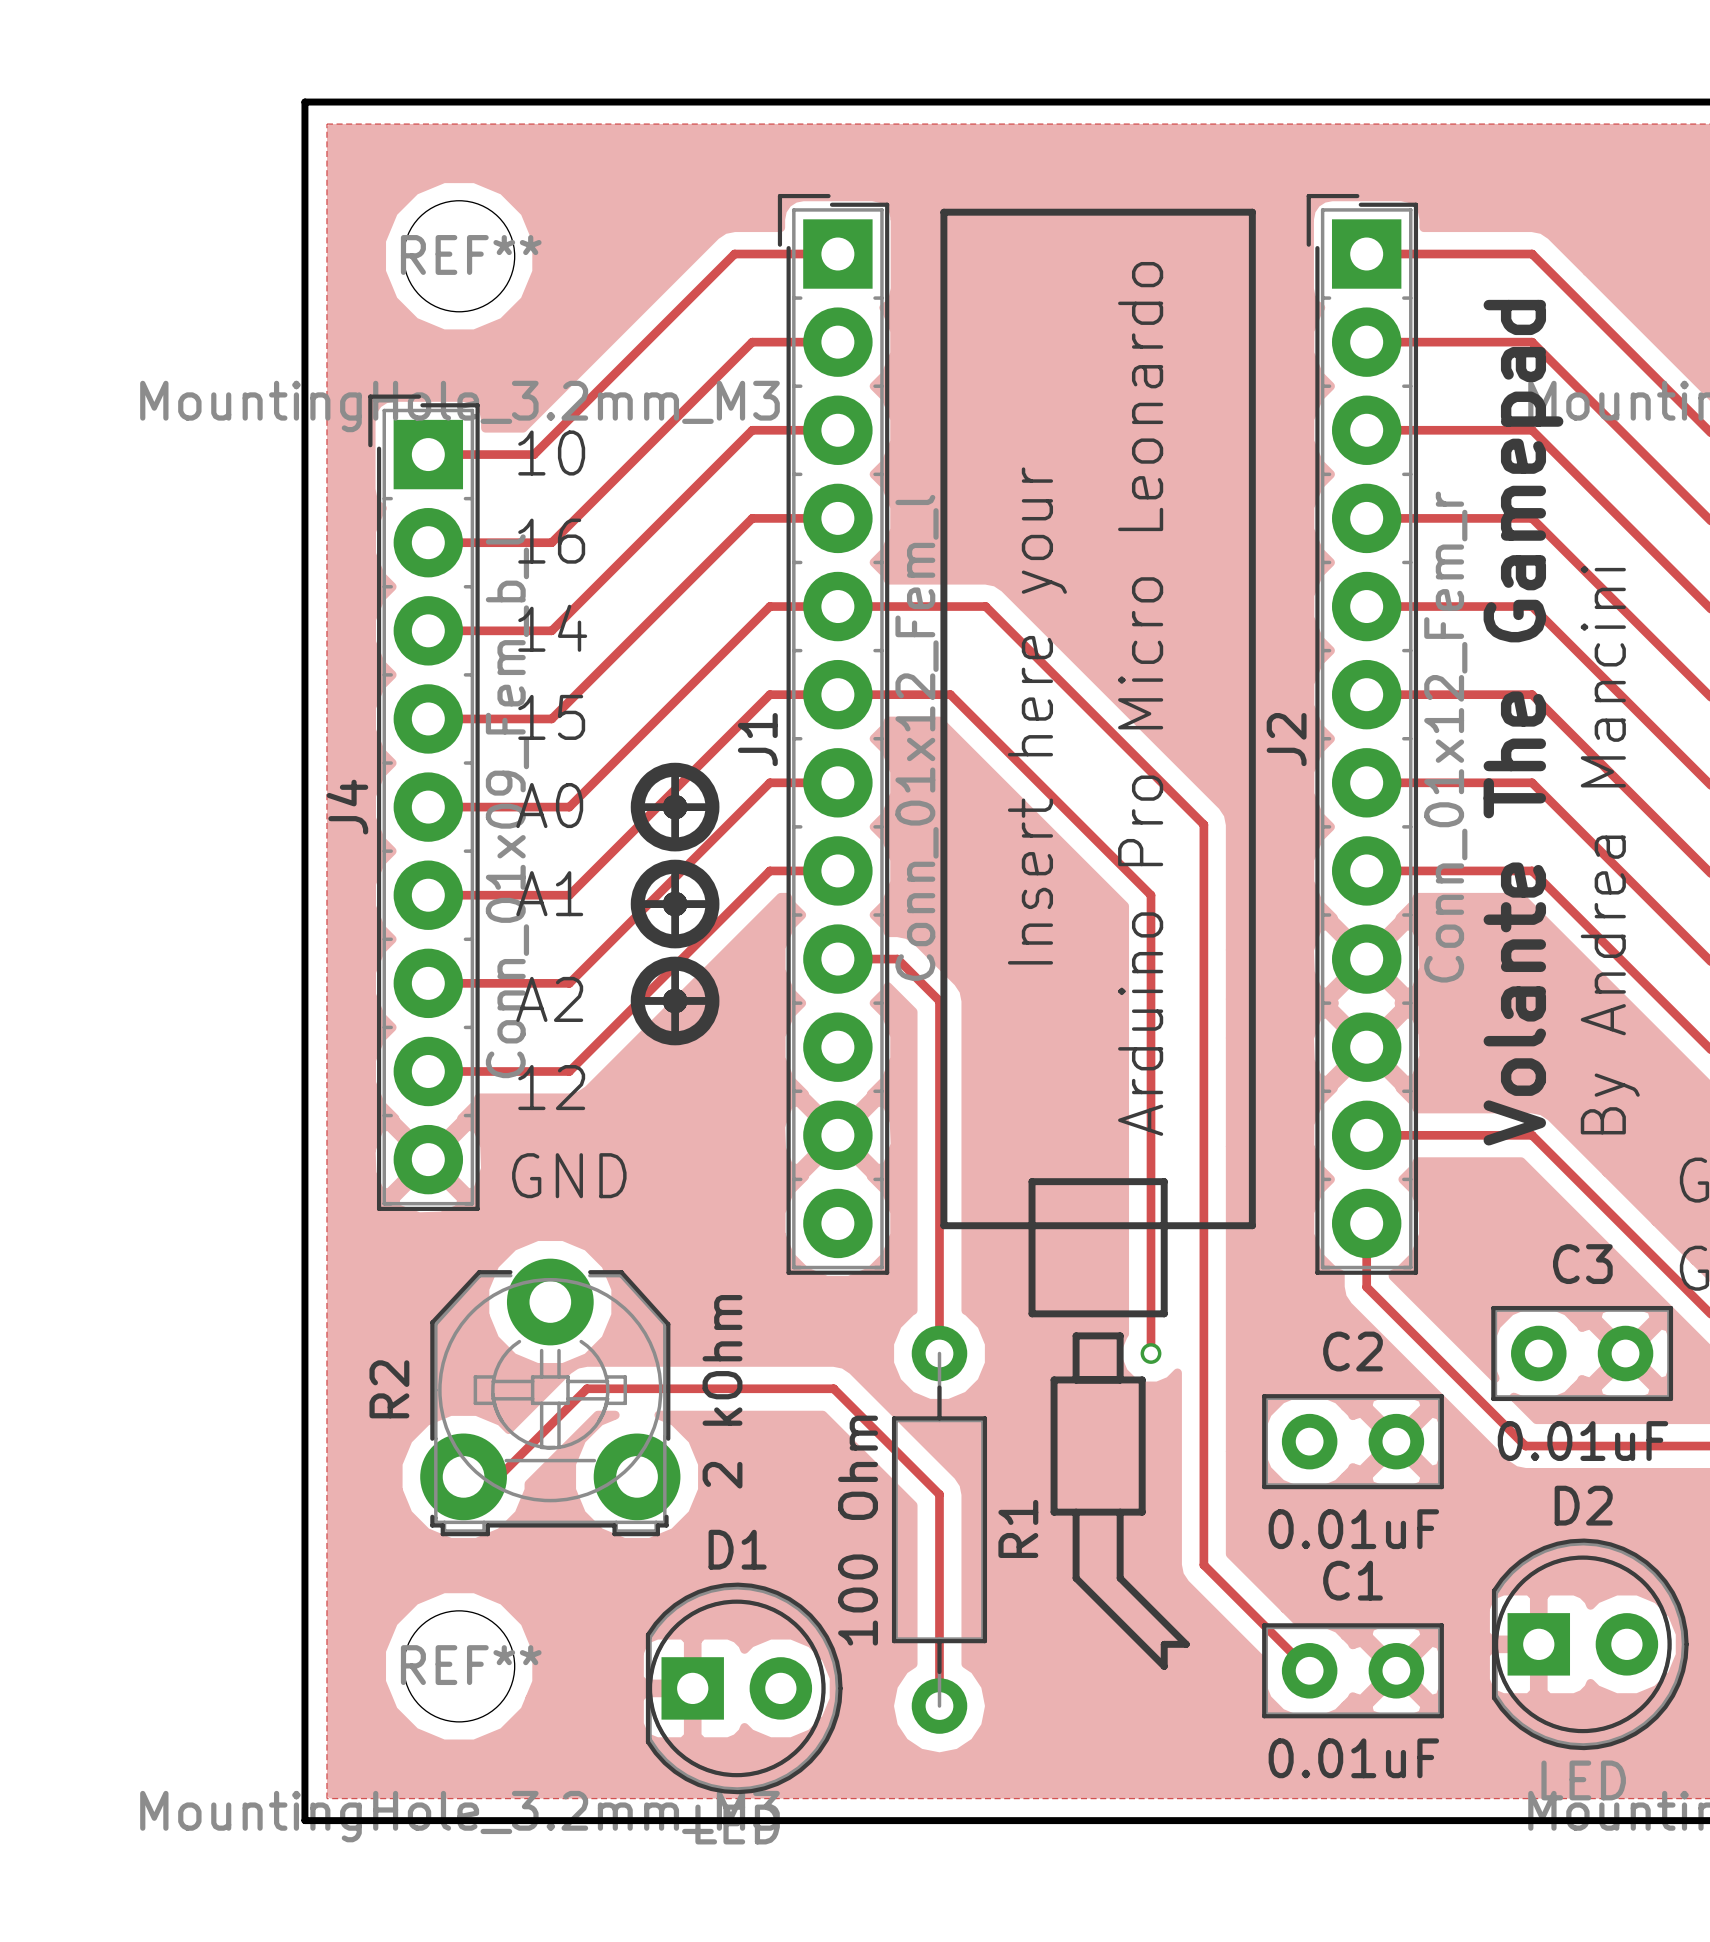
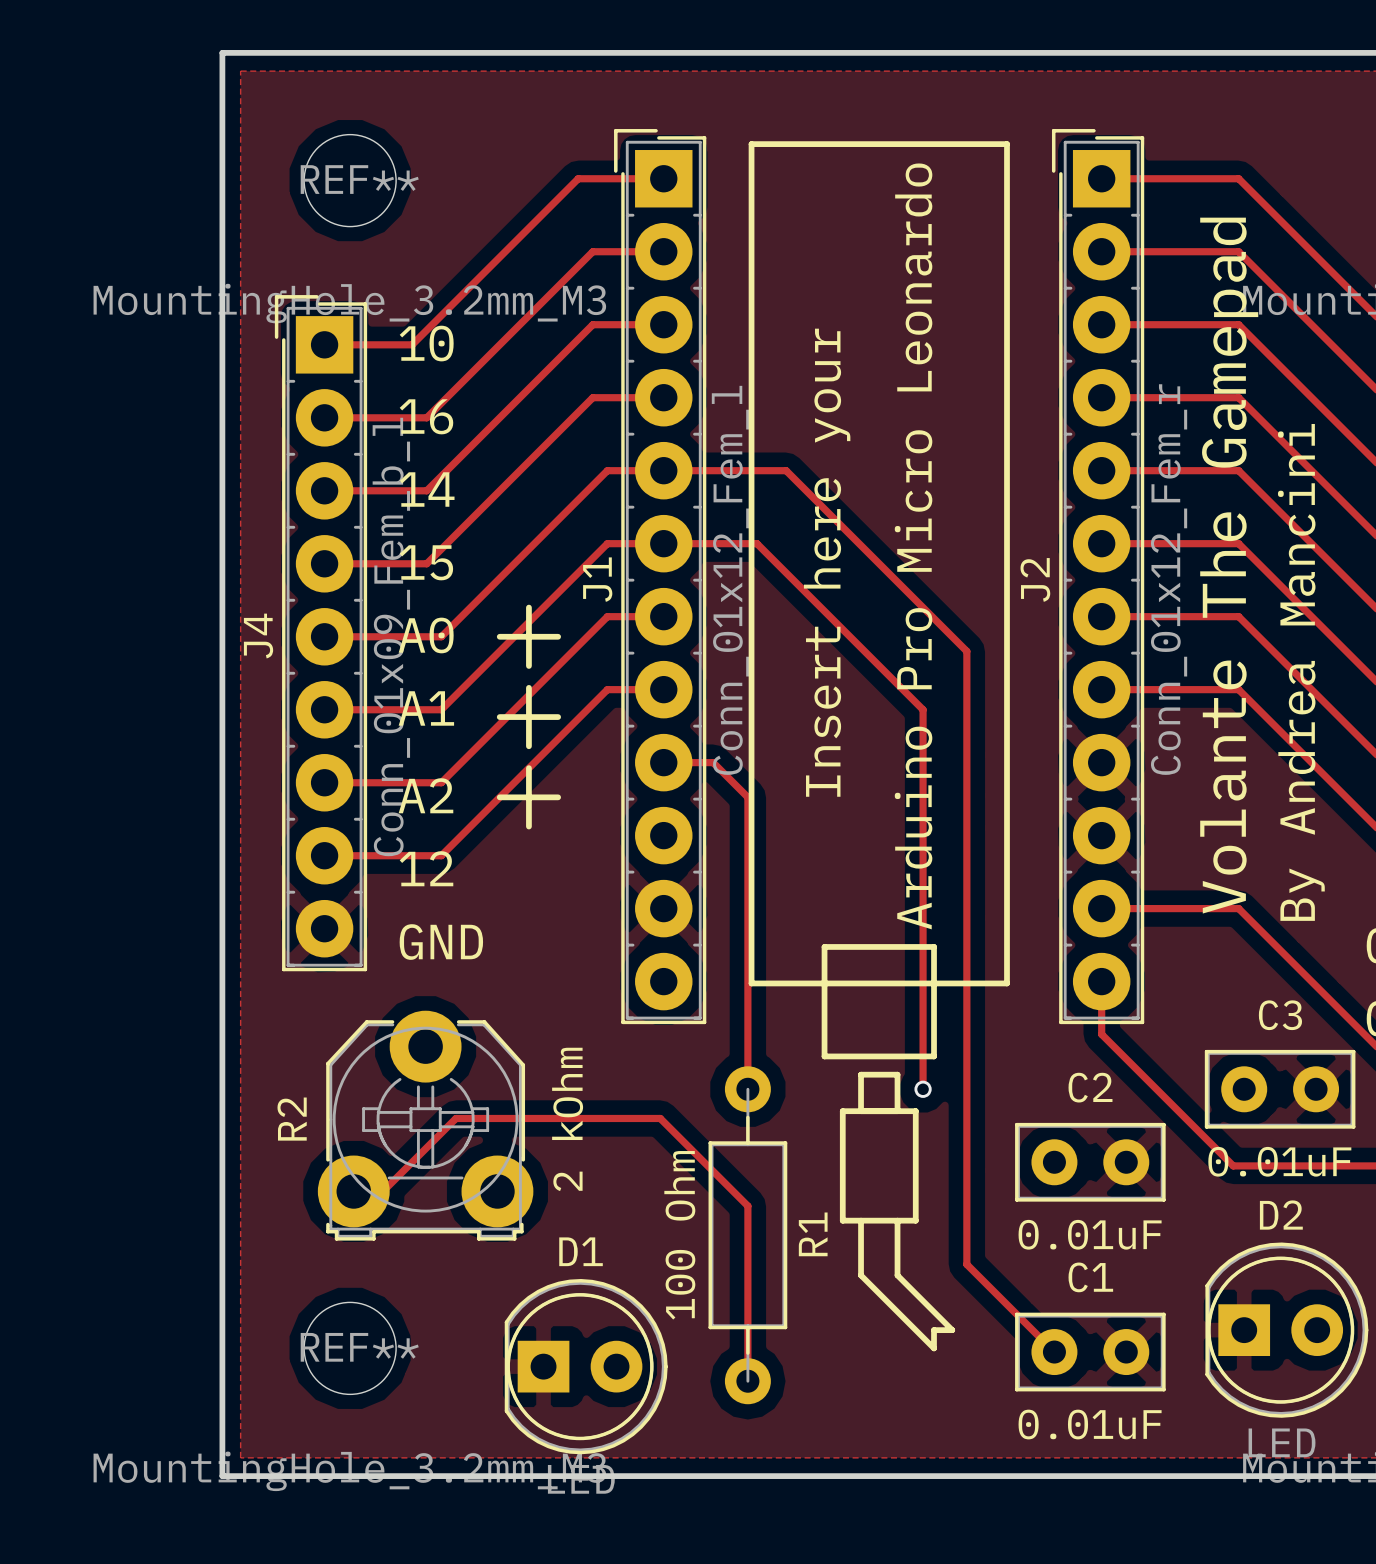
drawing: [630, 762, 720, 1046] -> none

